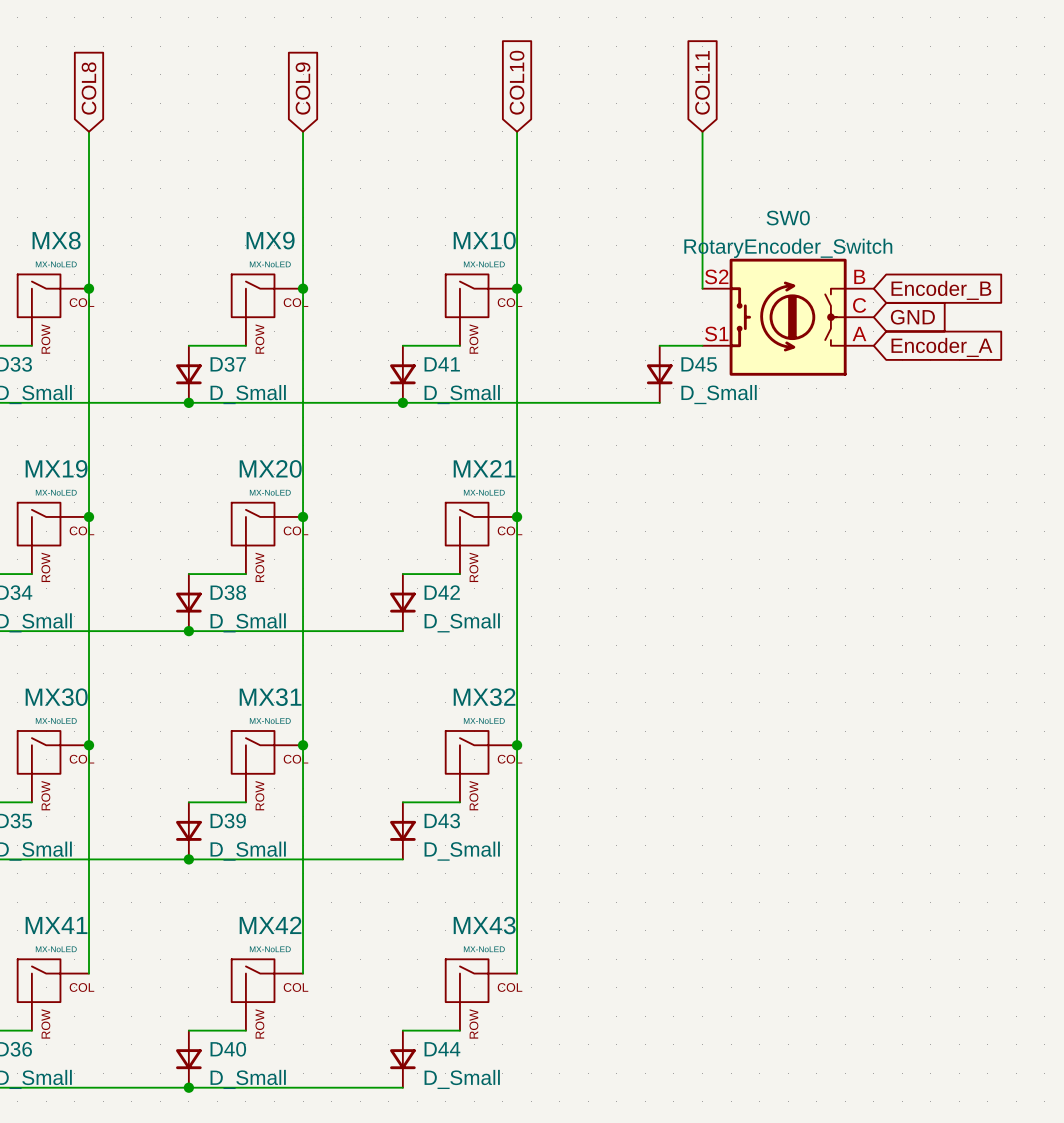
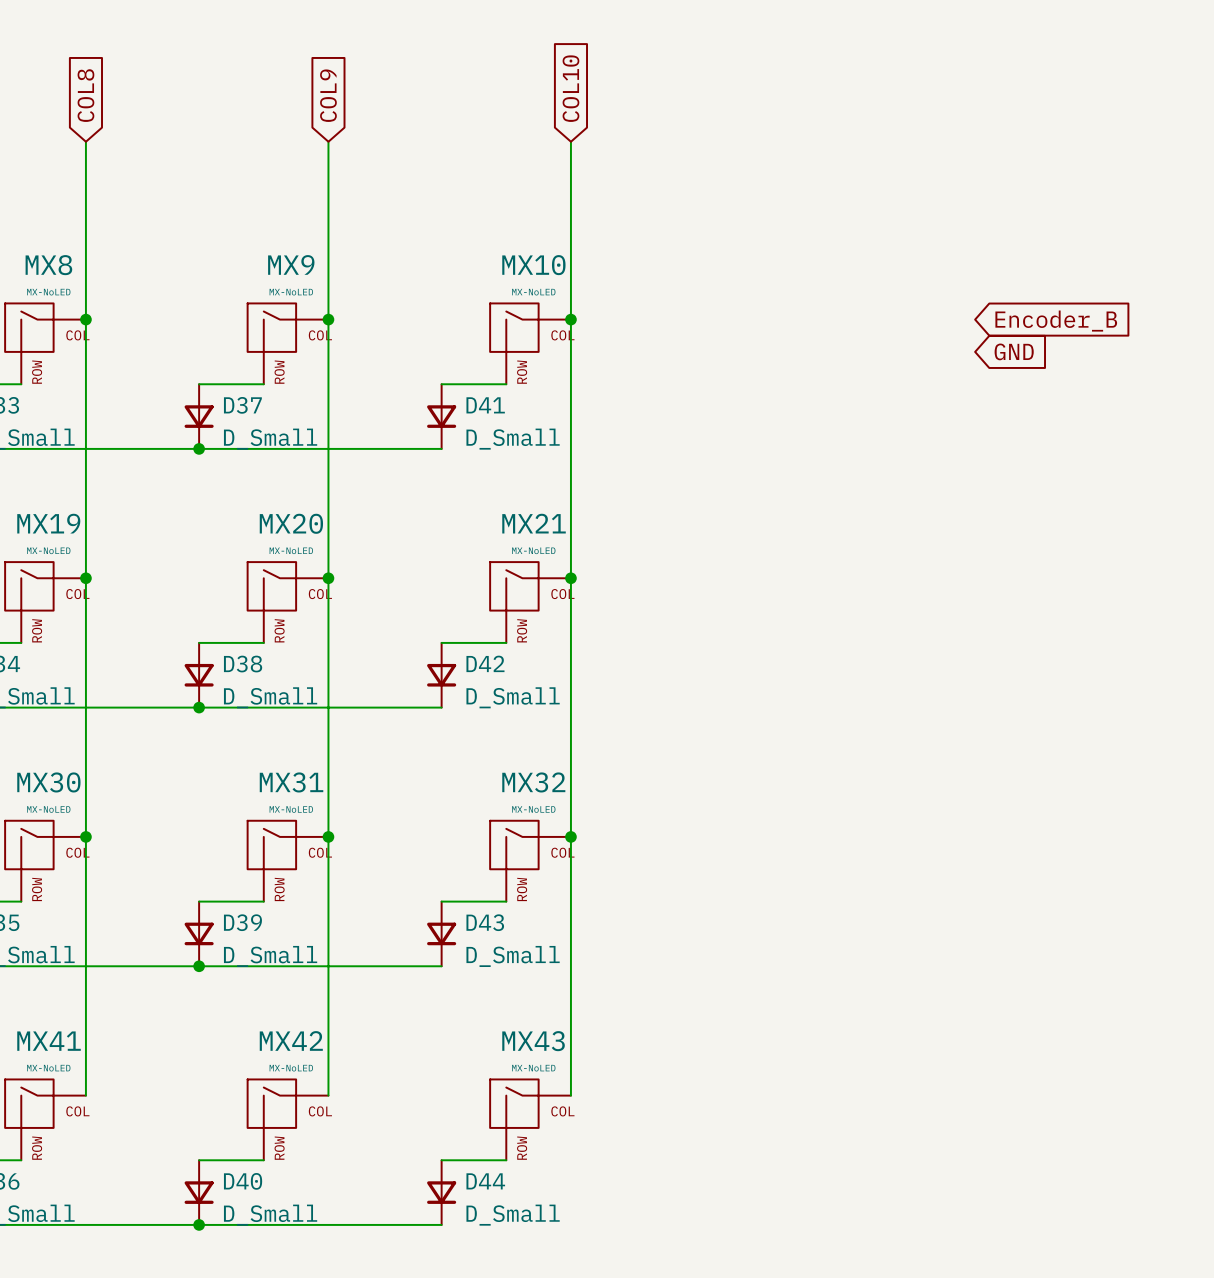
global label: COL11 (702, 82) -> none
wire: (702, 131) (702, 288) -> none
SW0: RotaryEncoder_Switch (788, 317) -> none
wire: (659, 345) (702, 345) -> none
global label: Encoder_A (941, 347) -> none
D45: D_Small (659, 374) -> none
wire: (402, 402) (659, 402) -> none
junction: (402, 402) -> none

